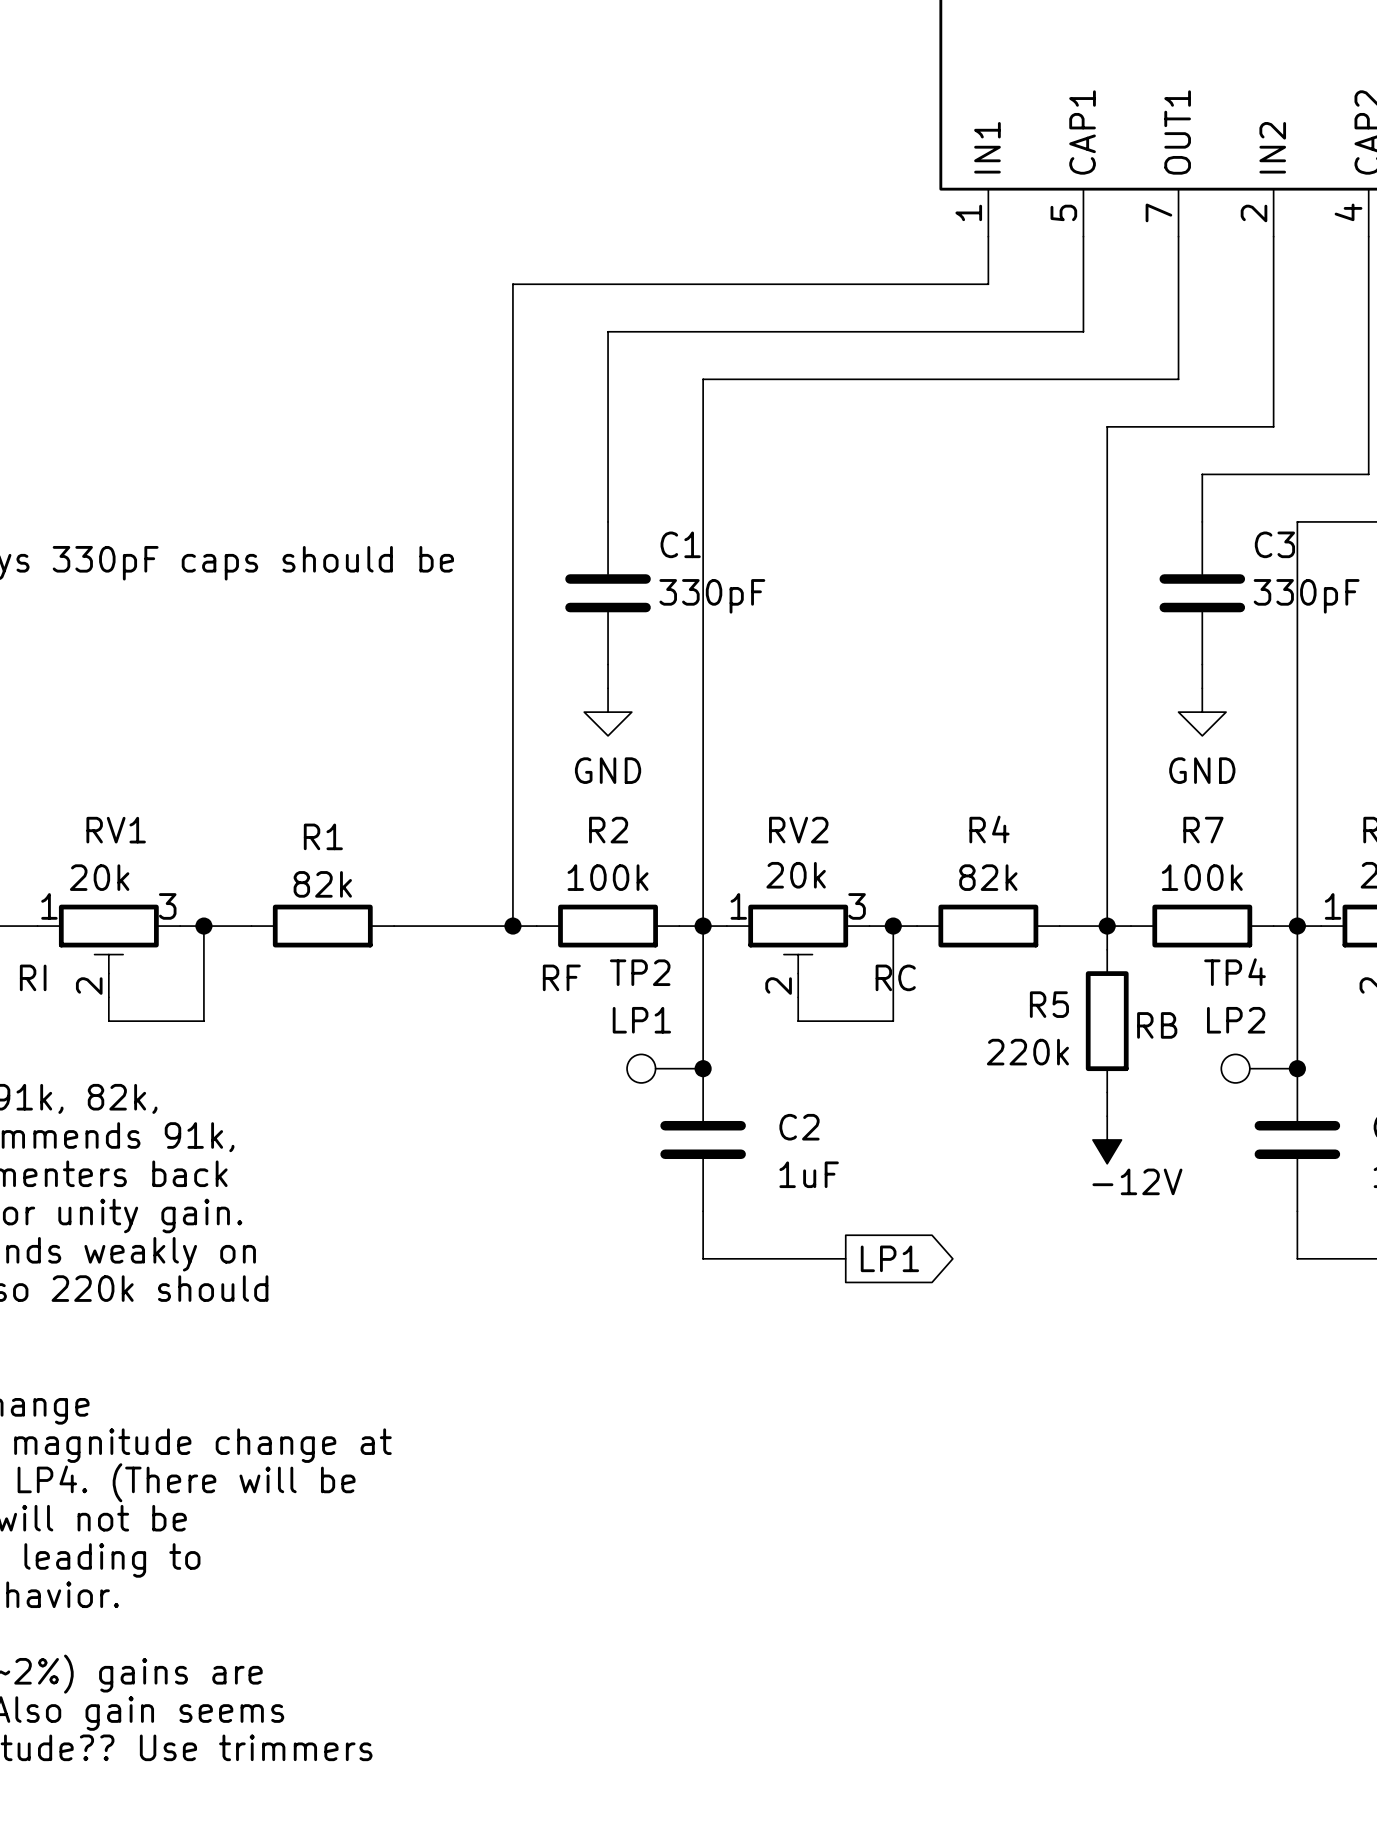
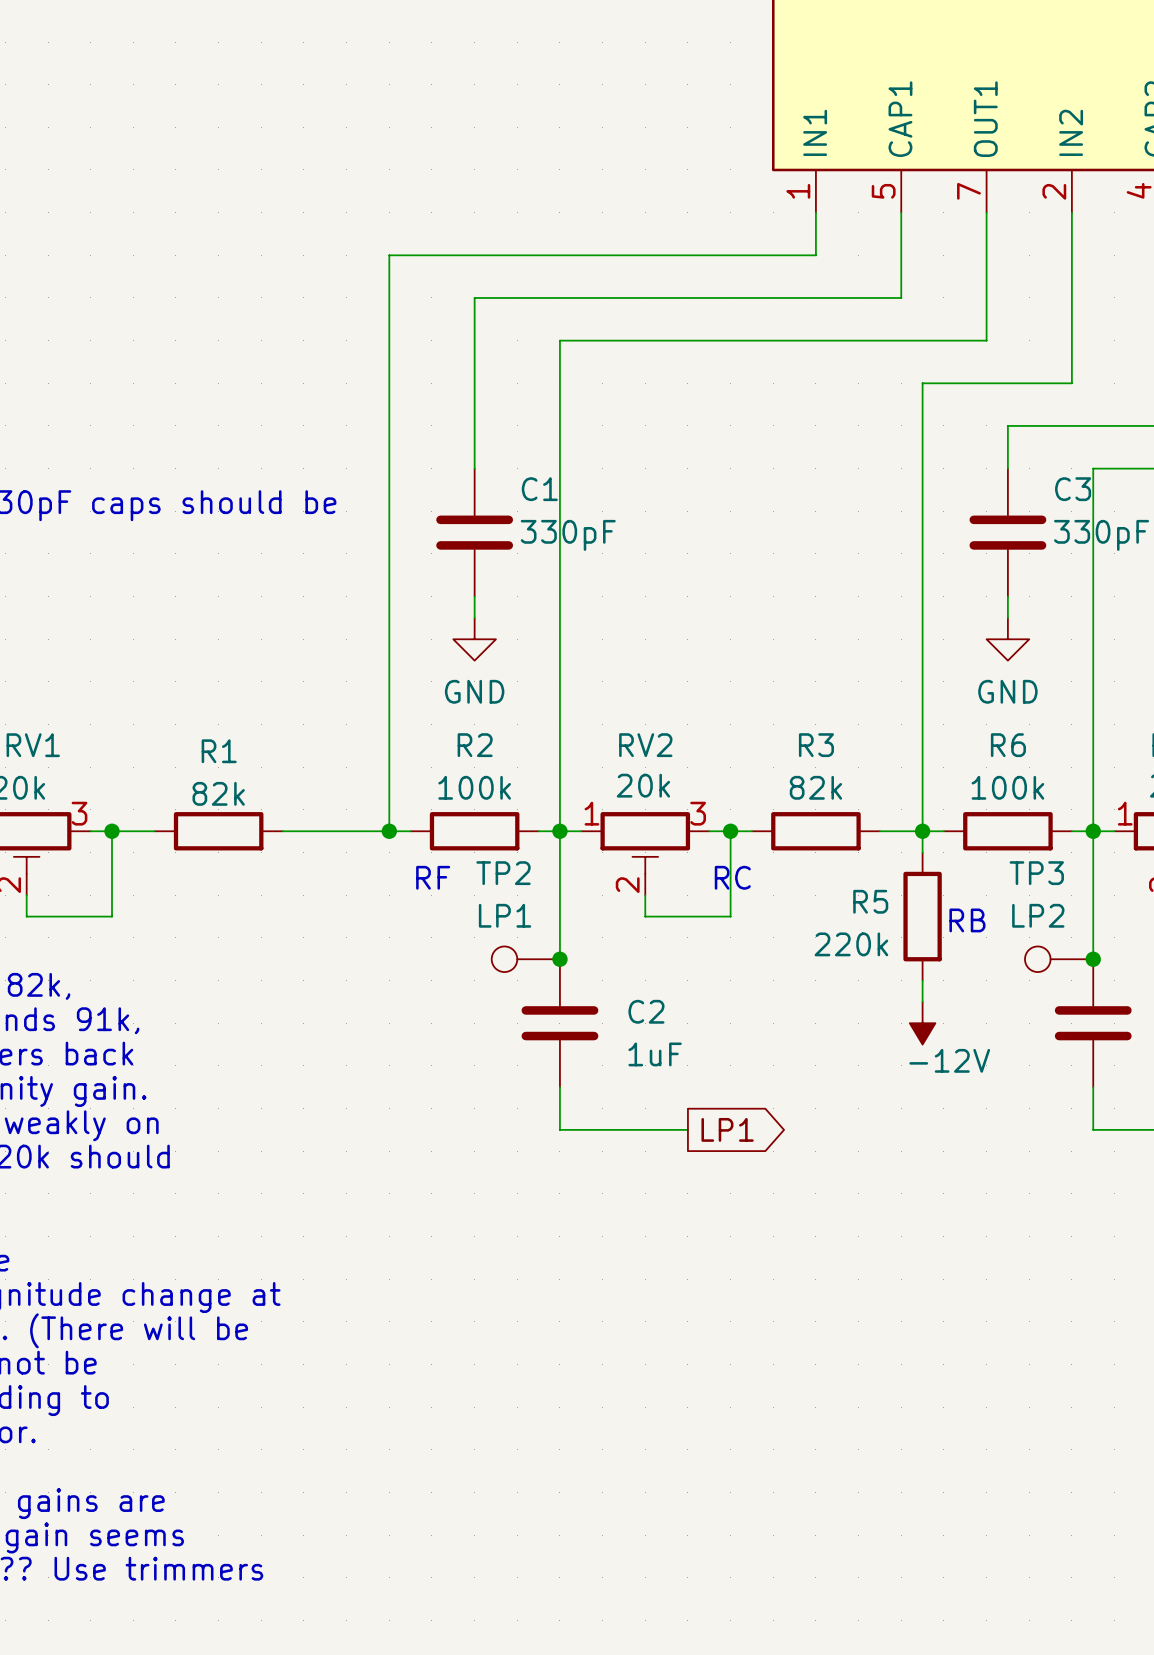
R4 name: R4 (989, 829) -> R3 (816, 745)
R7 name: R7 (1203, 830) -> R6 (1008, 745)
TP4 name: TP4 (1235, 972) -> TP3 (1036, 873)

